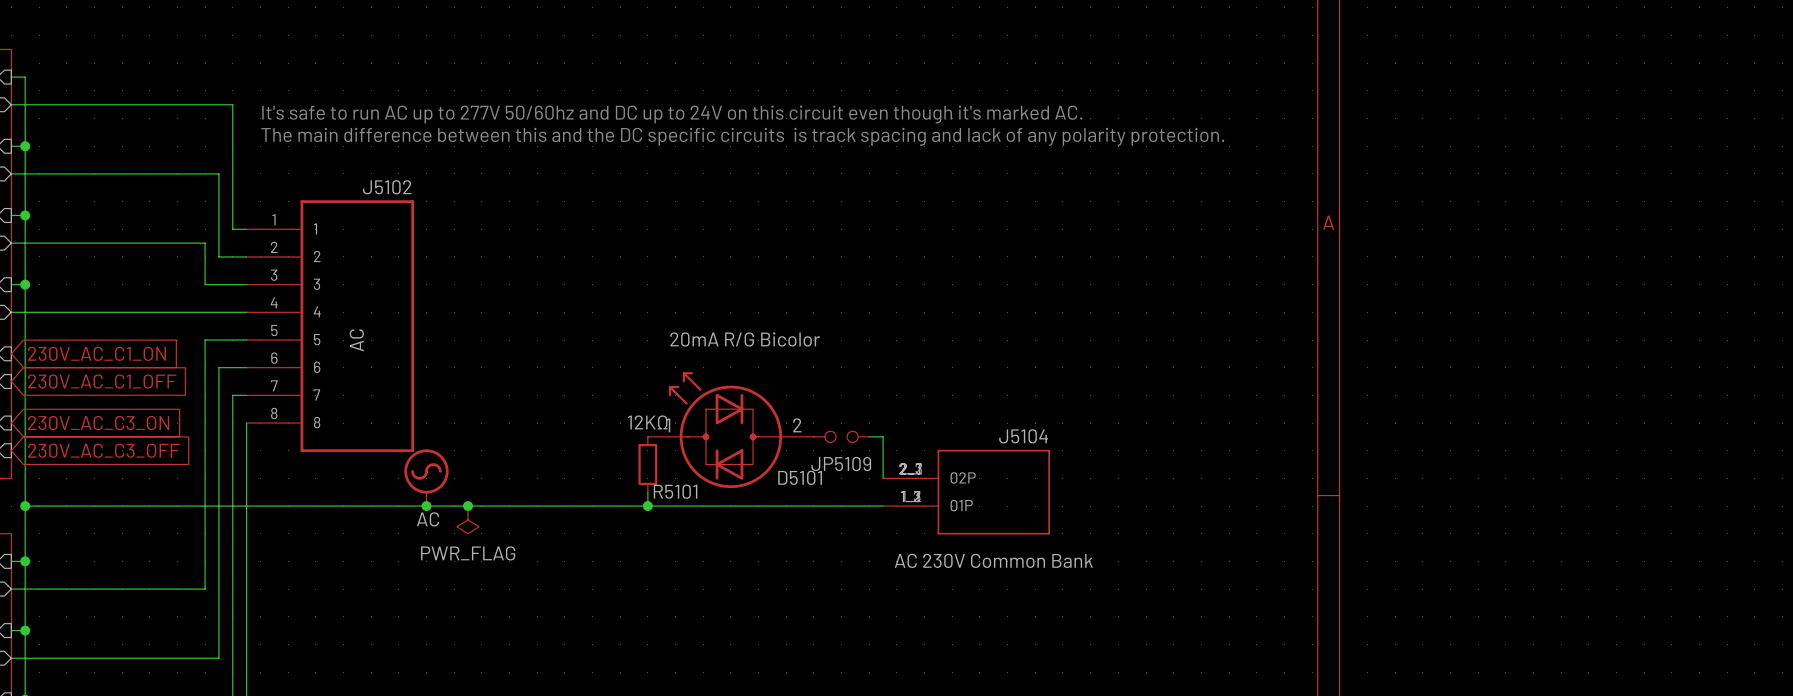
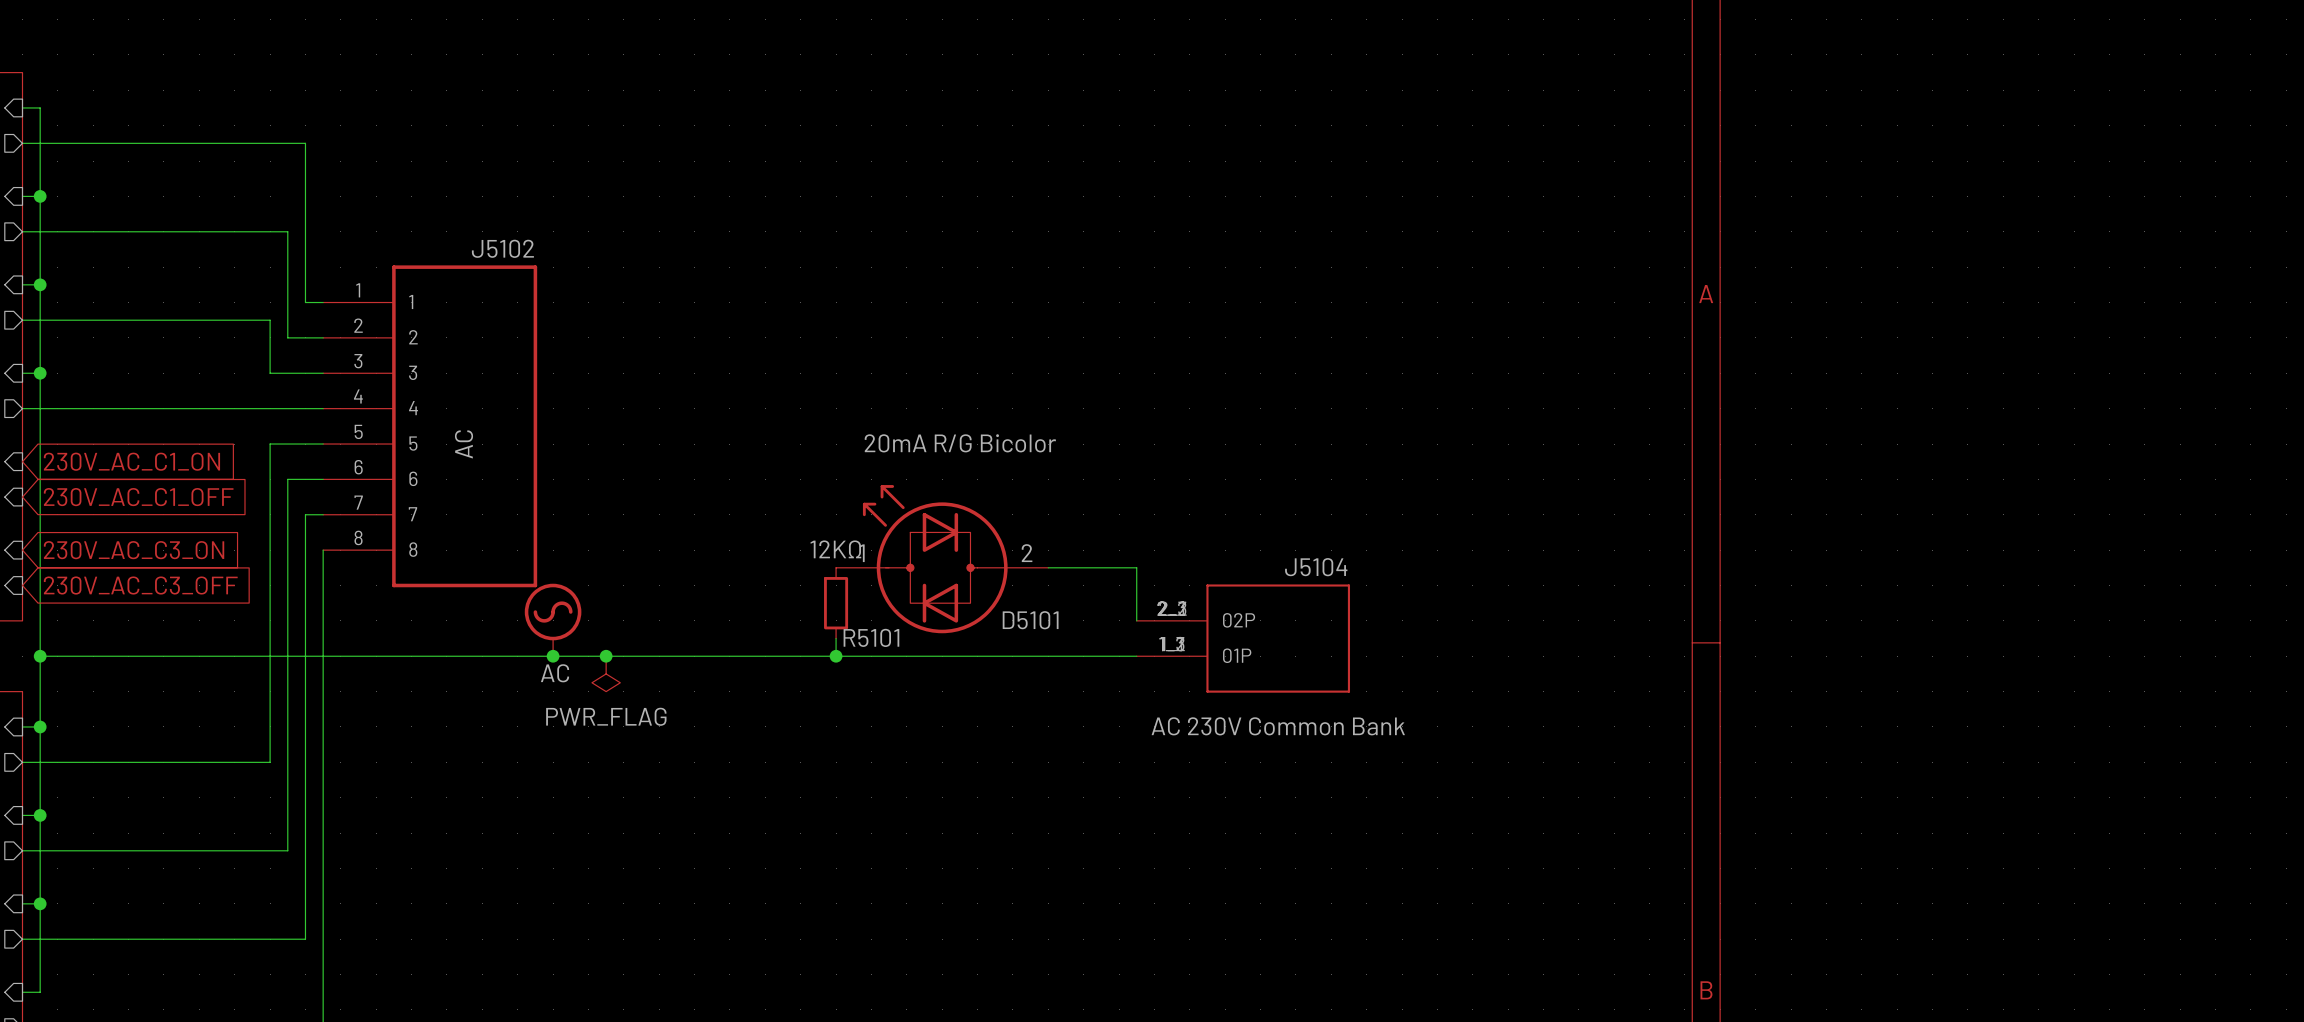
text: It's safe to run AC up to 277V 50/60hz and DC up to 24V on this circuit even though it's marked AC. (672, 114) -> none
text: The main difference between this and the DC specific circuits is track spacing and lack of any polarity protection. (742, 136) -> none
wire: none -> (1048, 567) (1119, 567)
JP5109: (841, 436) -> none

